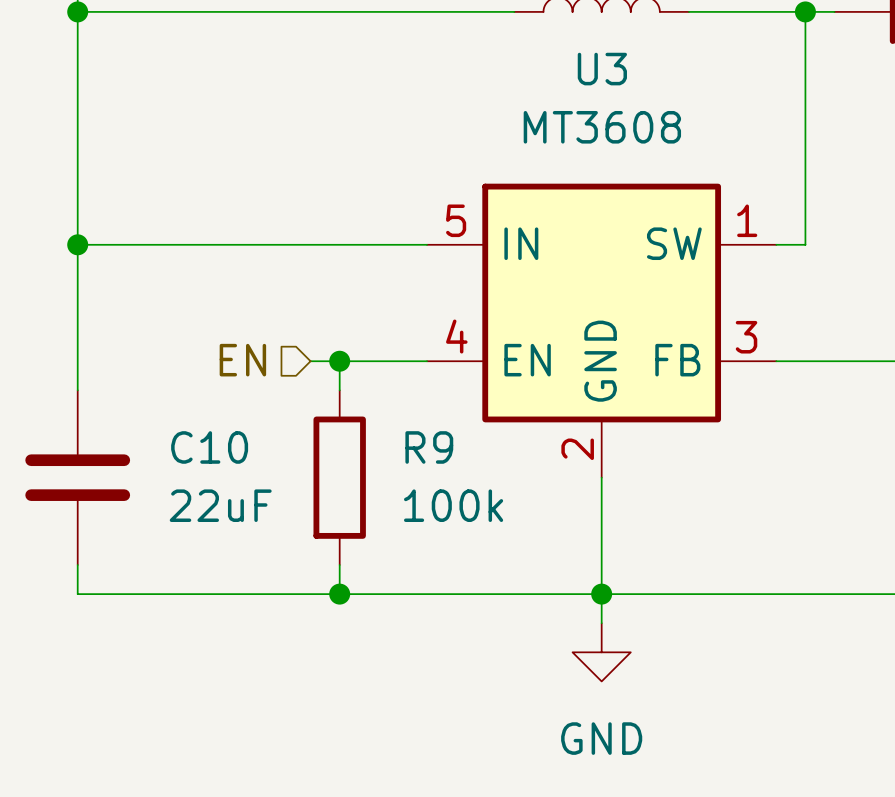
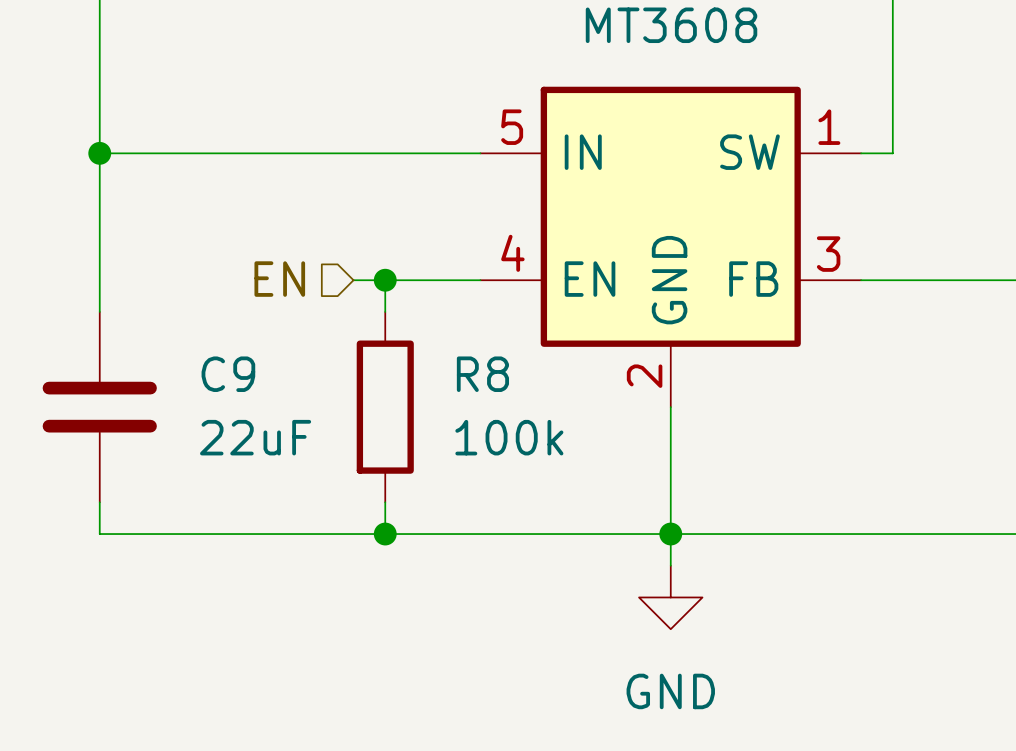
C10 name: C10 (209, 447) -> C9 (228, 374)
R9 name: R9 (429, 447) -> R8 (482, 374)

